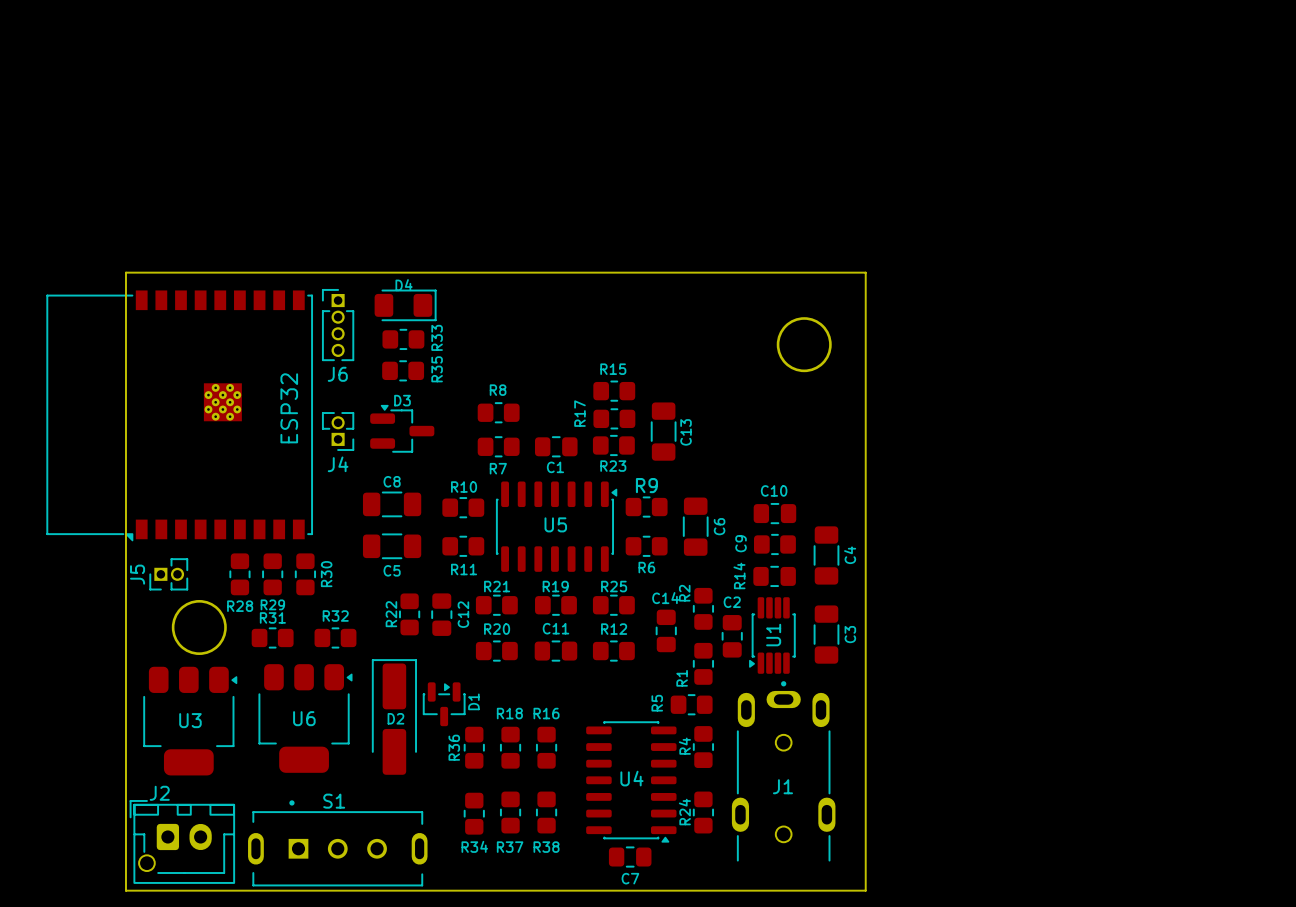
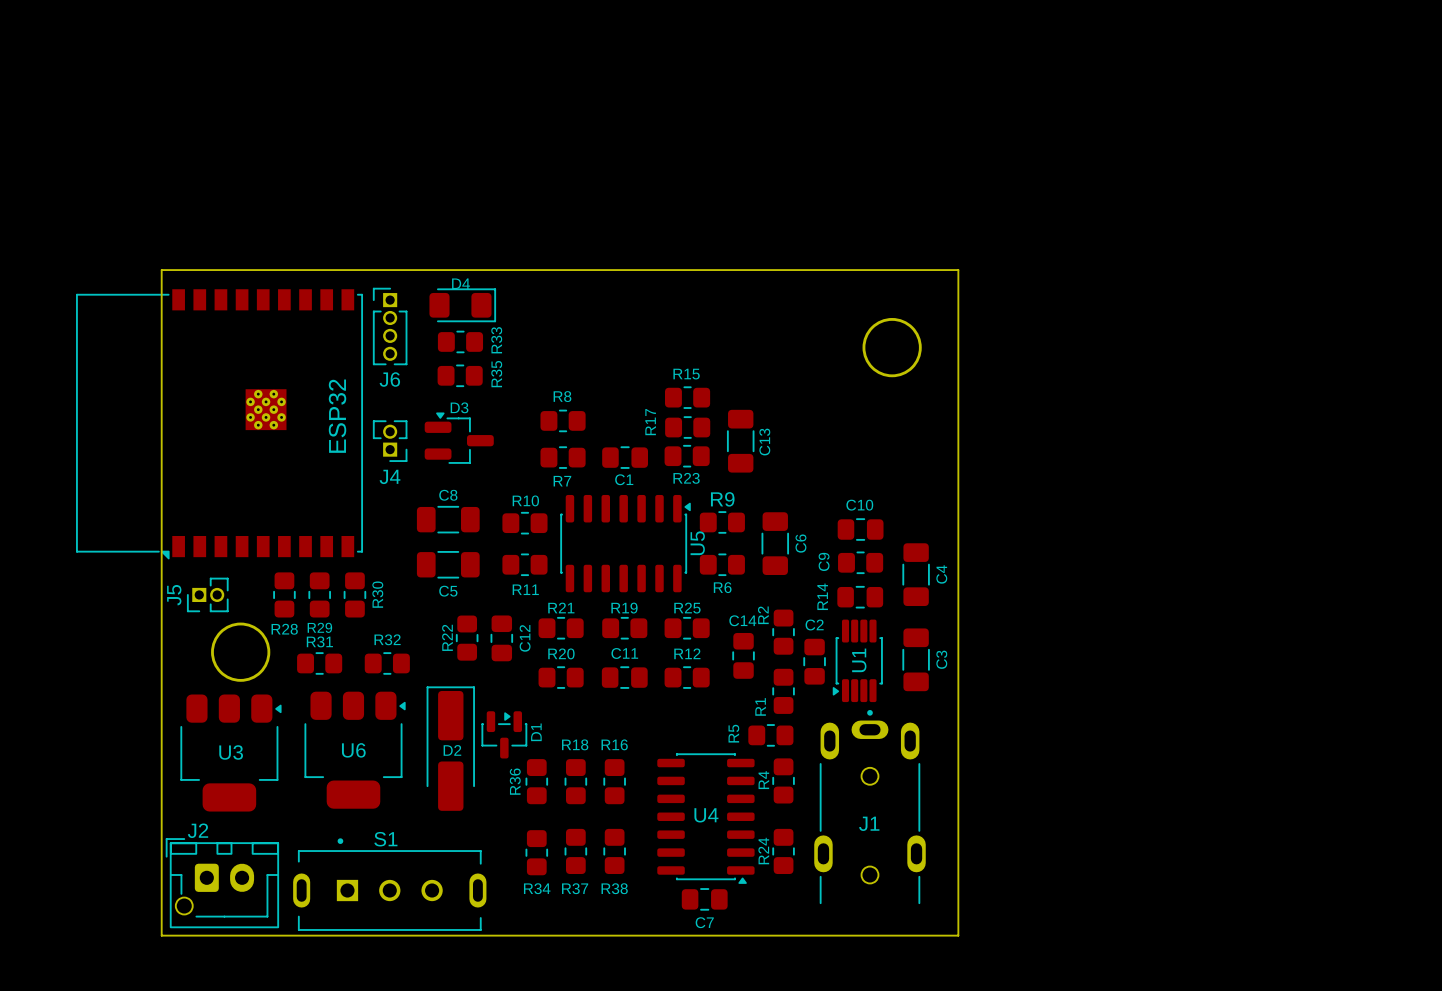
U5 name rotation: 0° (555, 524) -> 90° counterclockwise (697, 543)
U5 name position: U5 (555, 524) -> U5 (697, 543)

